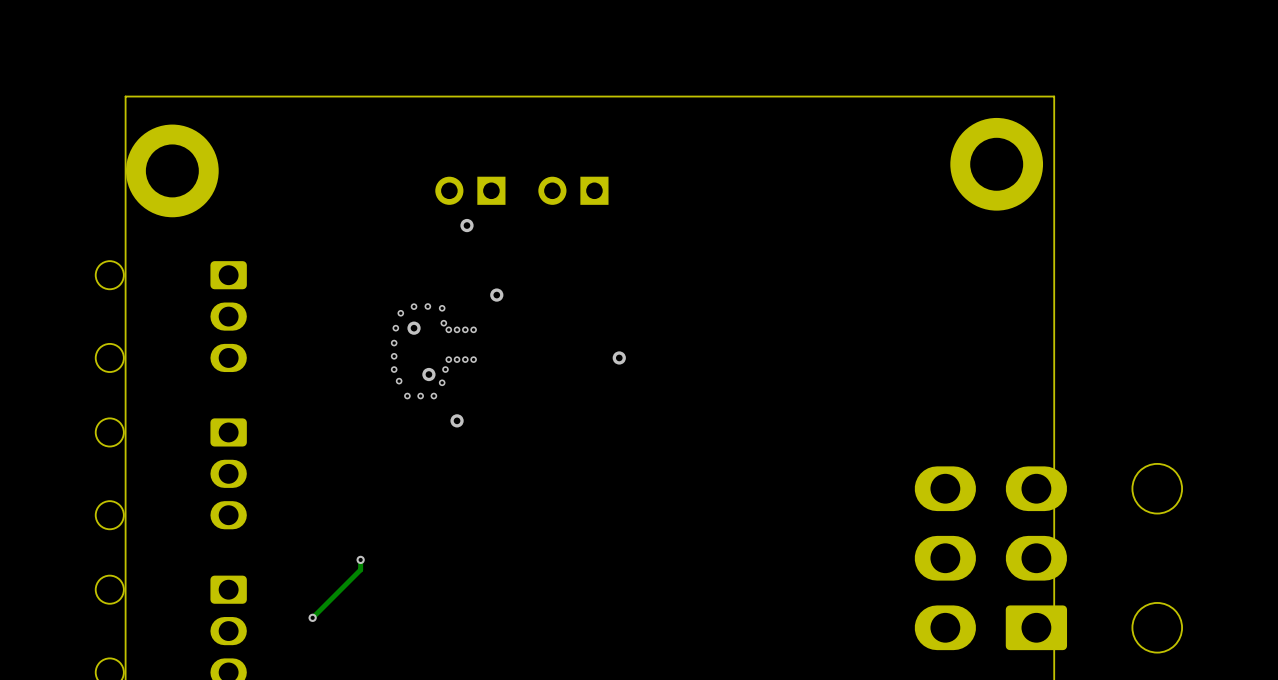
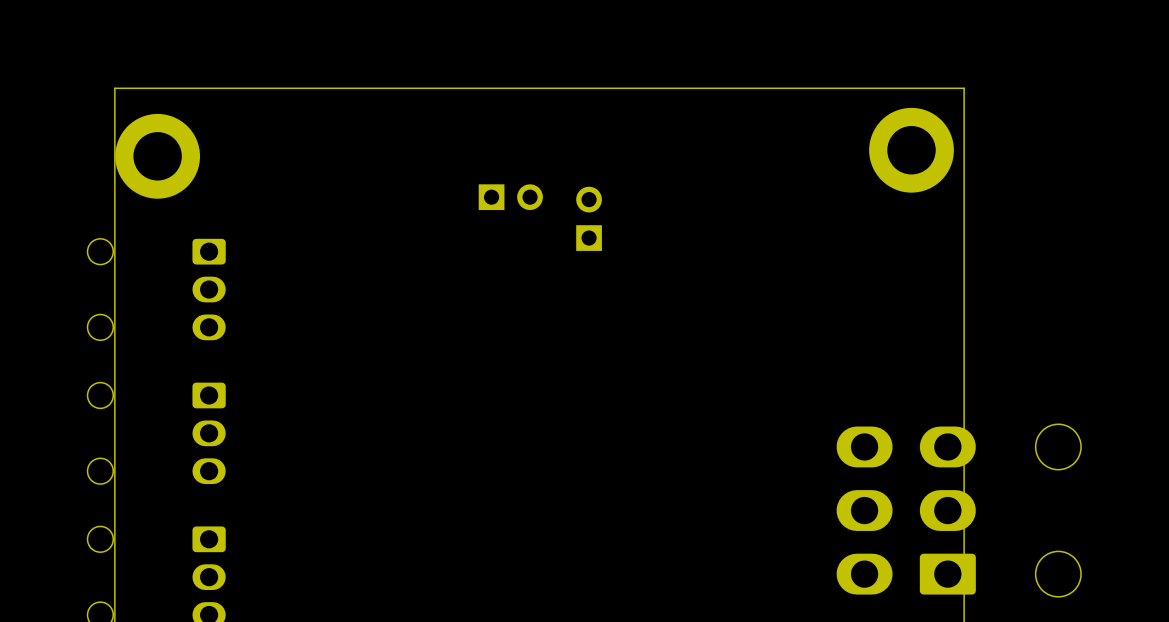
part: (470, 190) -> none
part rotation: 0° (573, 190) -> 180° (510, 197)
via: (466, 225) -> none
part: none -> (589, 218)
via: (496, 295) -> none
via: (414, 306) -> none
via: (427, 306) -> none
via: (442, 308) -> none
via: (400, 313) -> none
via: (443, 323) -> none
via: (395, 328) -> none
via: (414, 328) -> none
via: (448, 329) -> none
via: (457, 329) -> none
via: (465, 329) -> none
via: (473, 329) -> none
via: (394, 343) -> none
via: (394, 356) -> none
via: (619, 357) -> none
via: (448, 359) -> none
via: (457, 359) -> none
via: (465, 359) -> none
via: (473, 359) -> none
via: (394, 369) -> none
via: (445, 369) -> none
via: (428, 374) -> none
via: (399, 381) -> none
via: (442, 382) -> none
via: (407, 396) -> none
via: (420, 396) -> none
via: (433, 396) -> none
via: (457, 420) -> none
track: (360, 559) (360, 569) (312, 617) -> none
via: (360, 559) -> none
via: (312, 617) -> none

